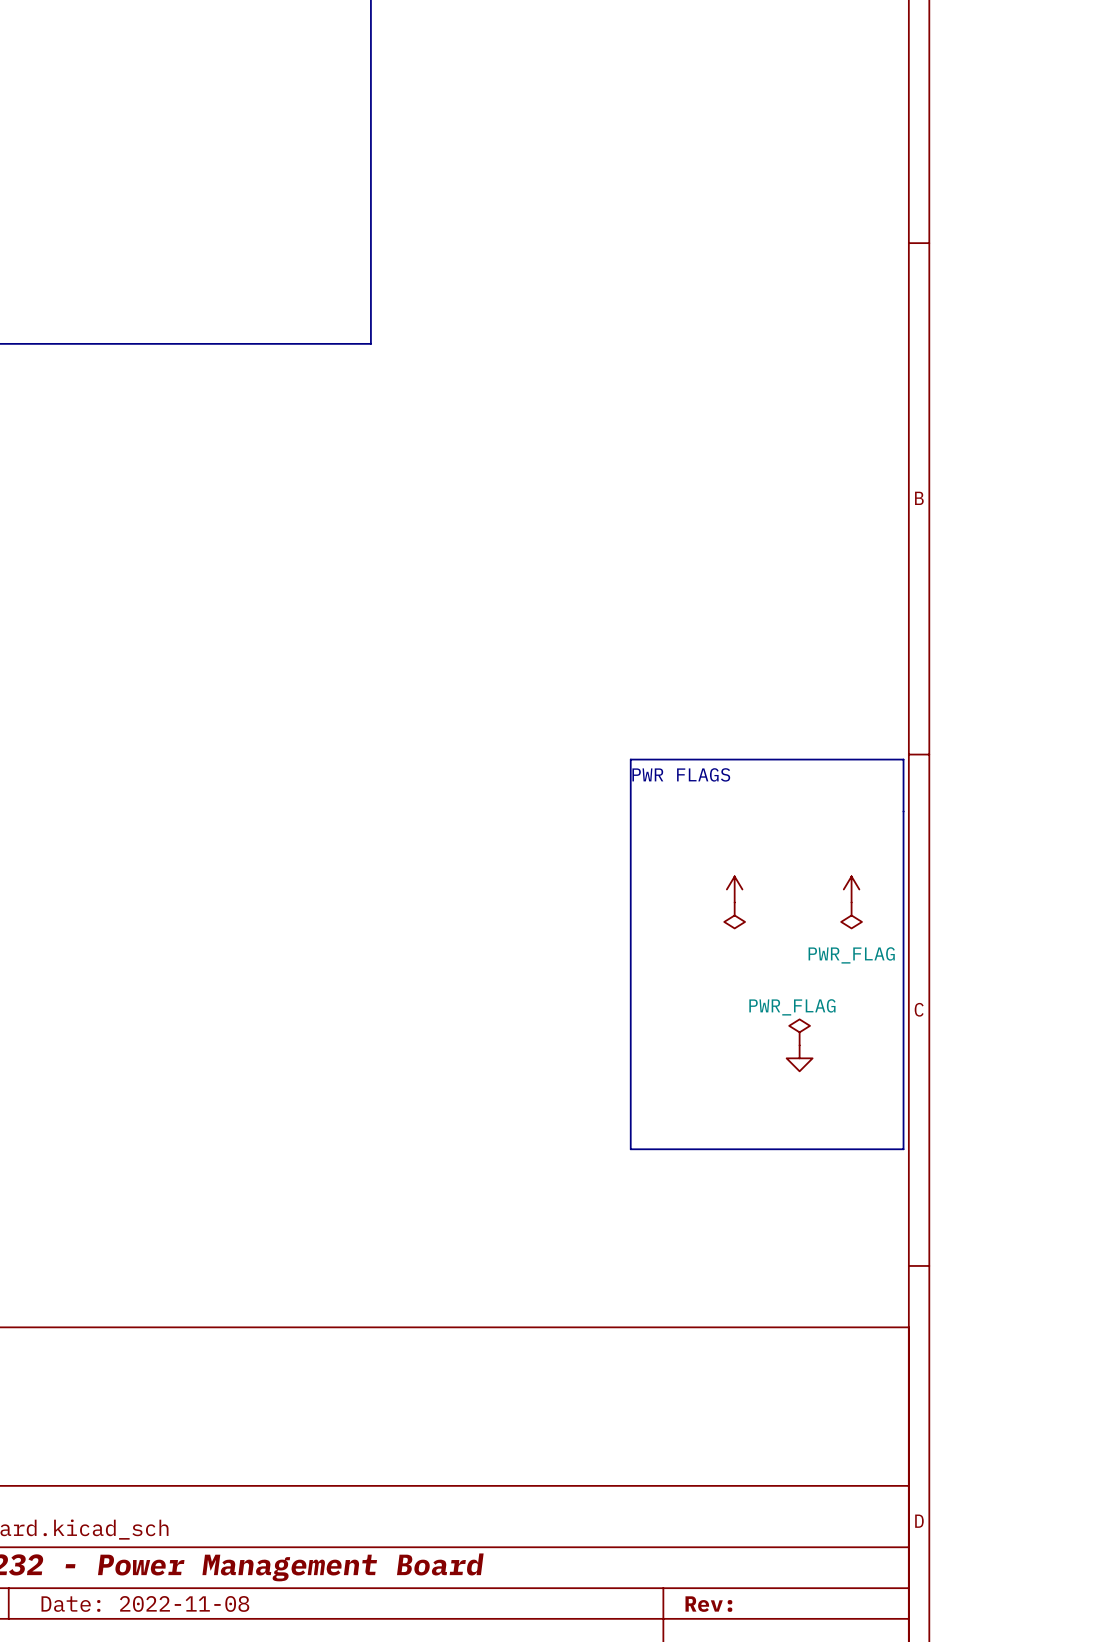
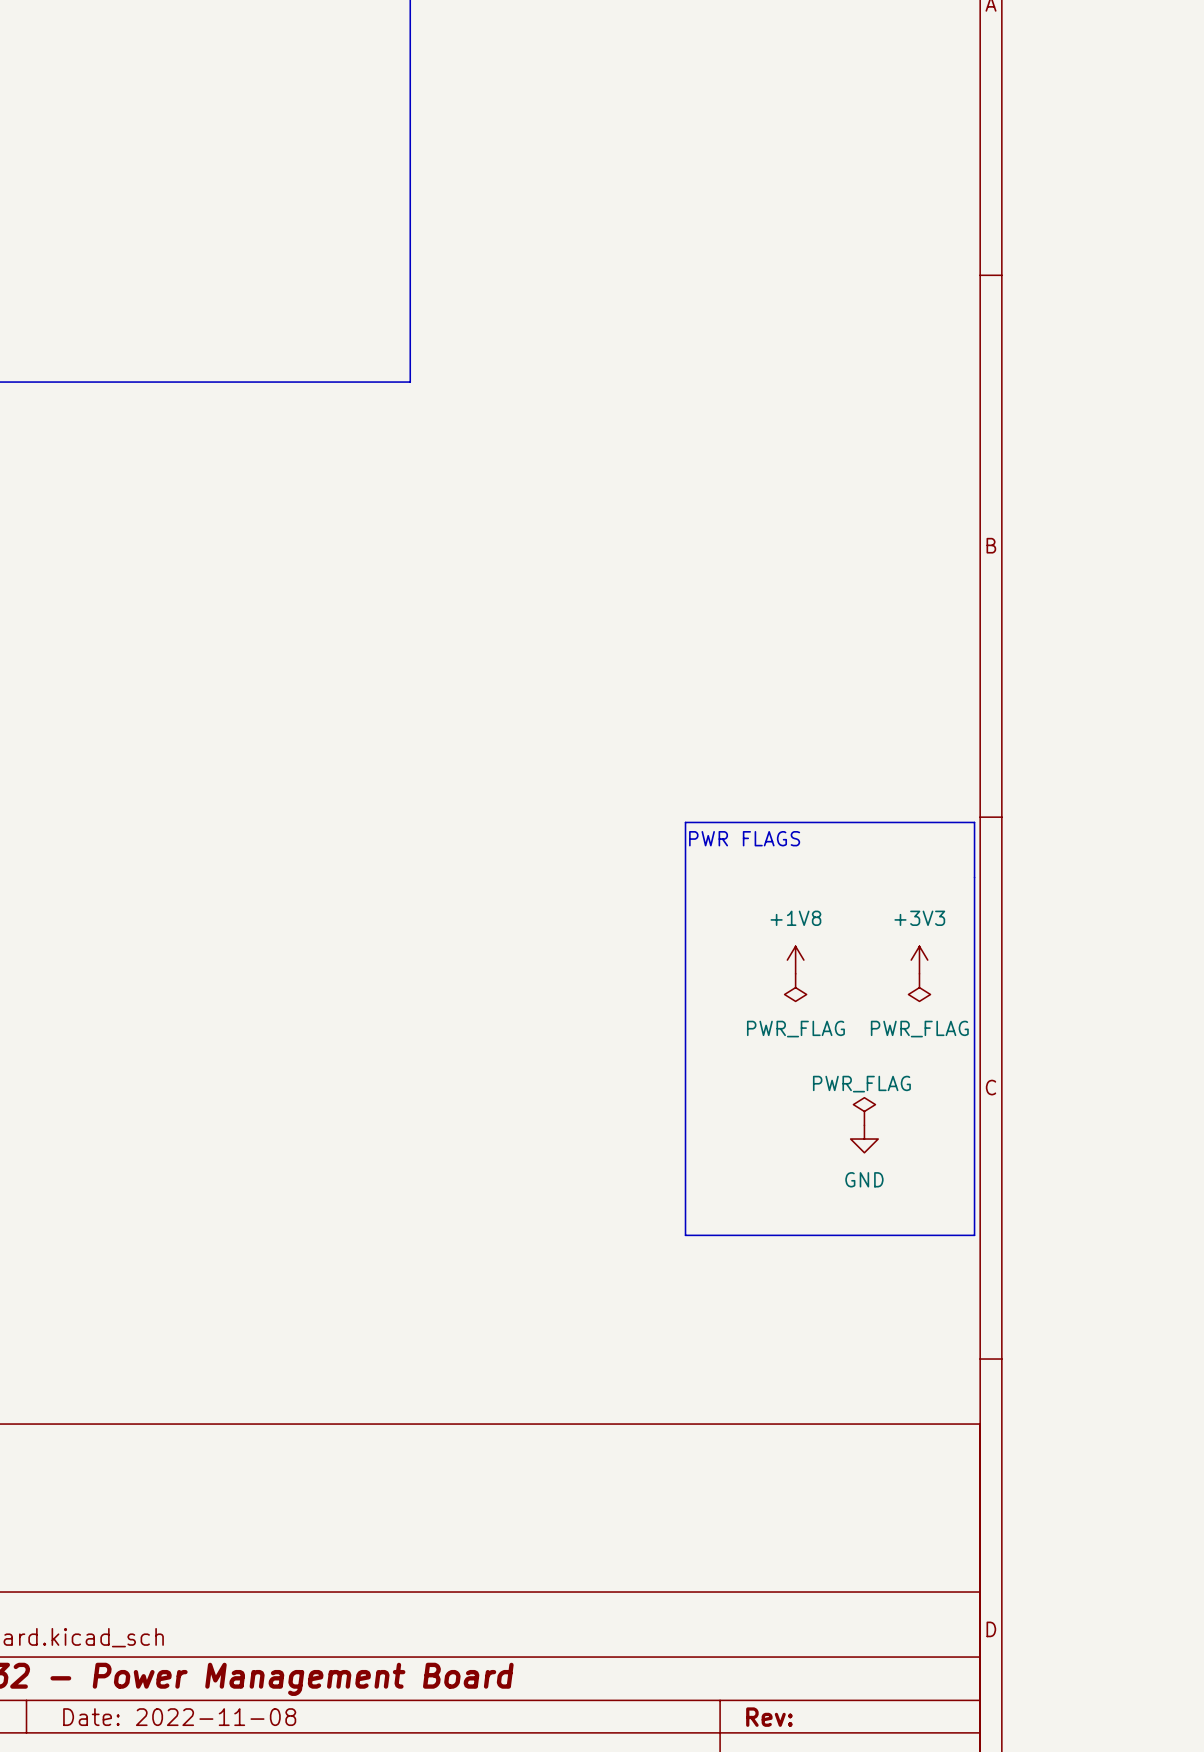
power symbol text: none -> +1V8 (795, 918)
power symbol text: none -> +3V3 (919, 918)
power symbol text: none -> PWR_FLAG (795, 1029)
power symbol text: none -> GND (864, 1179)

